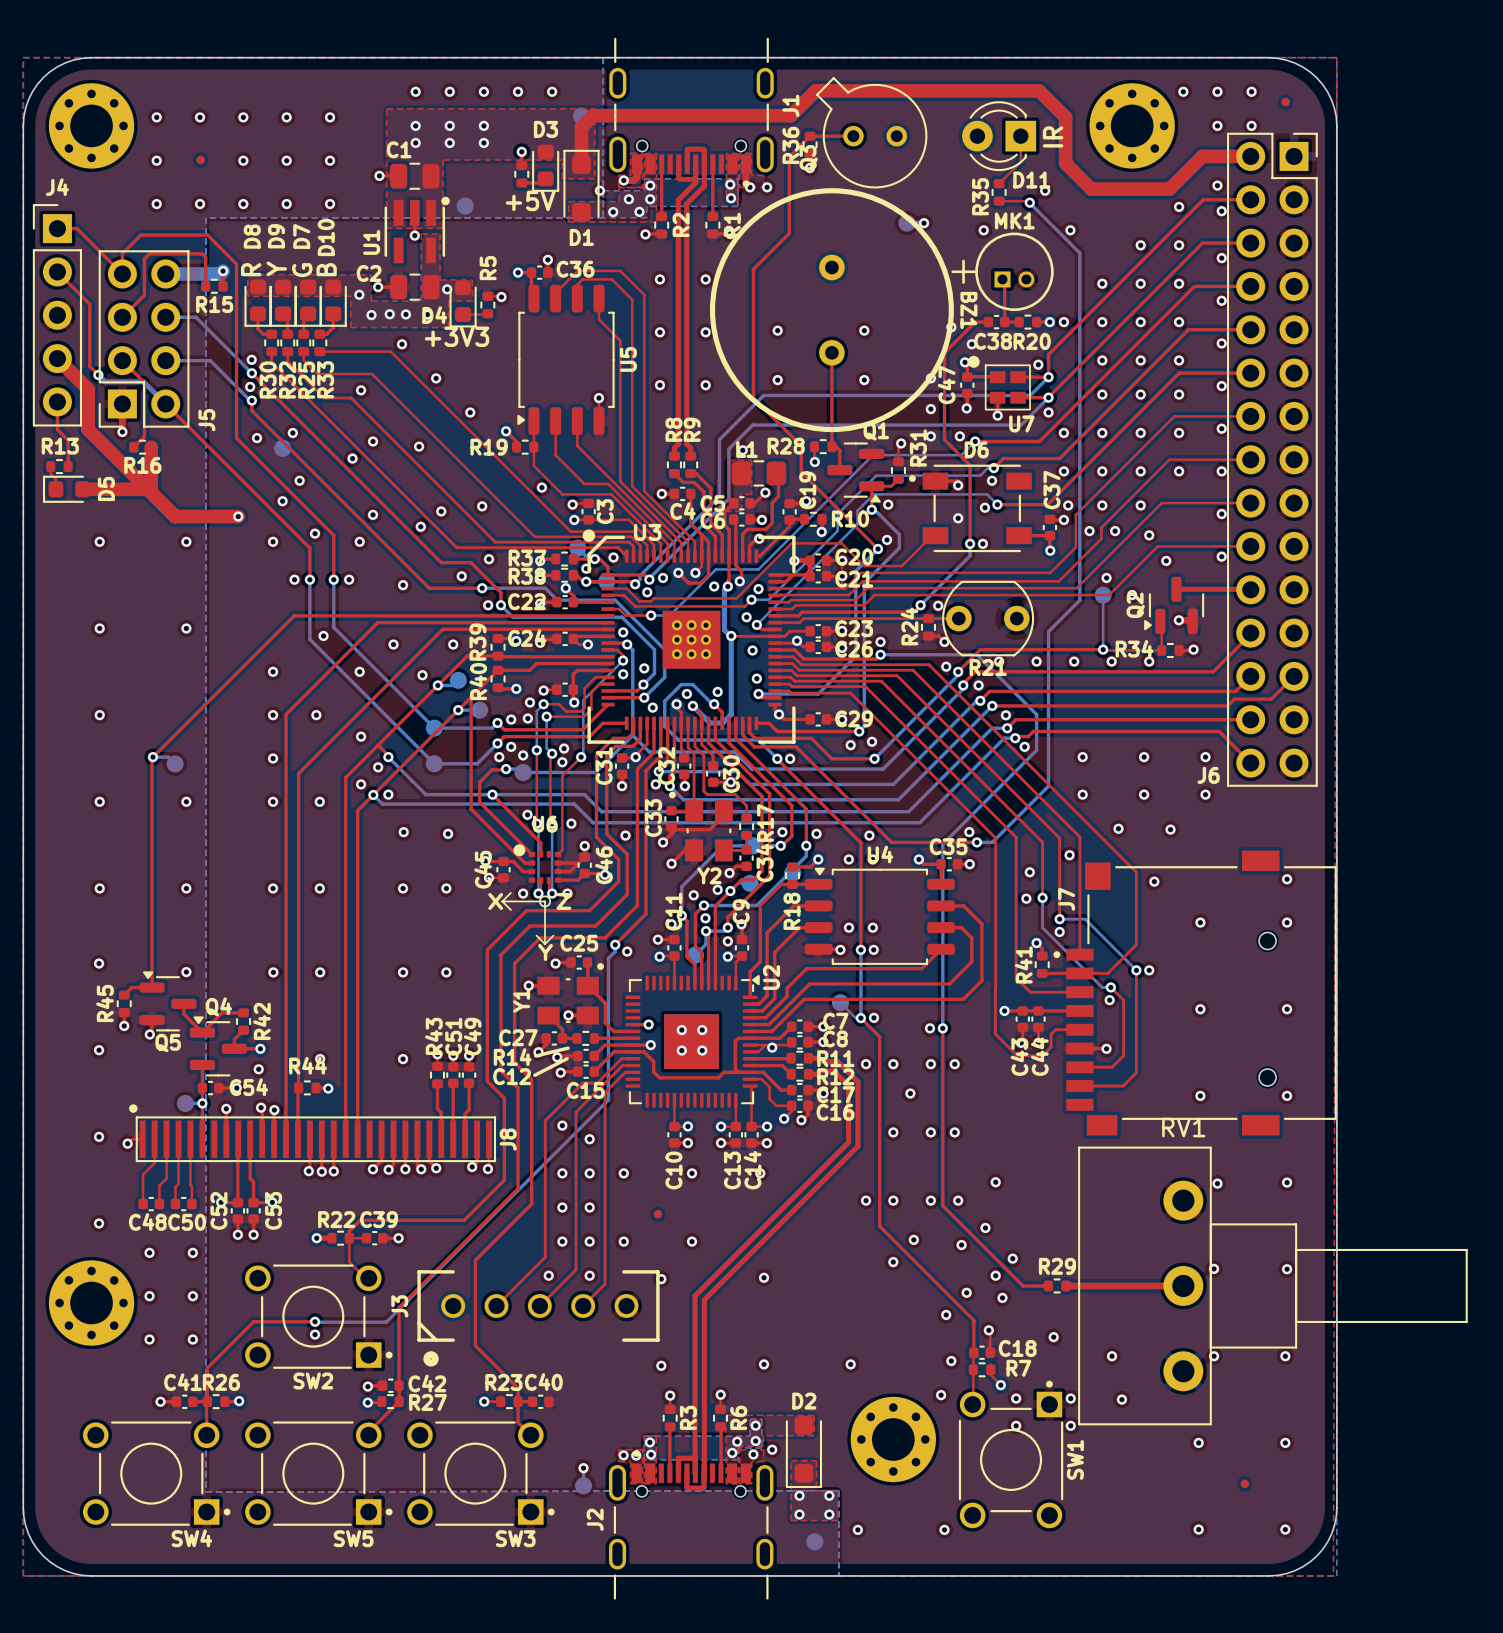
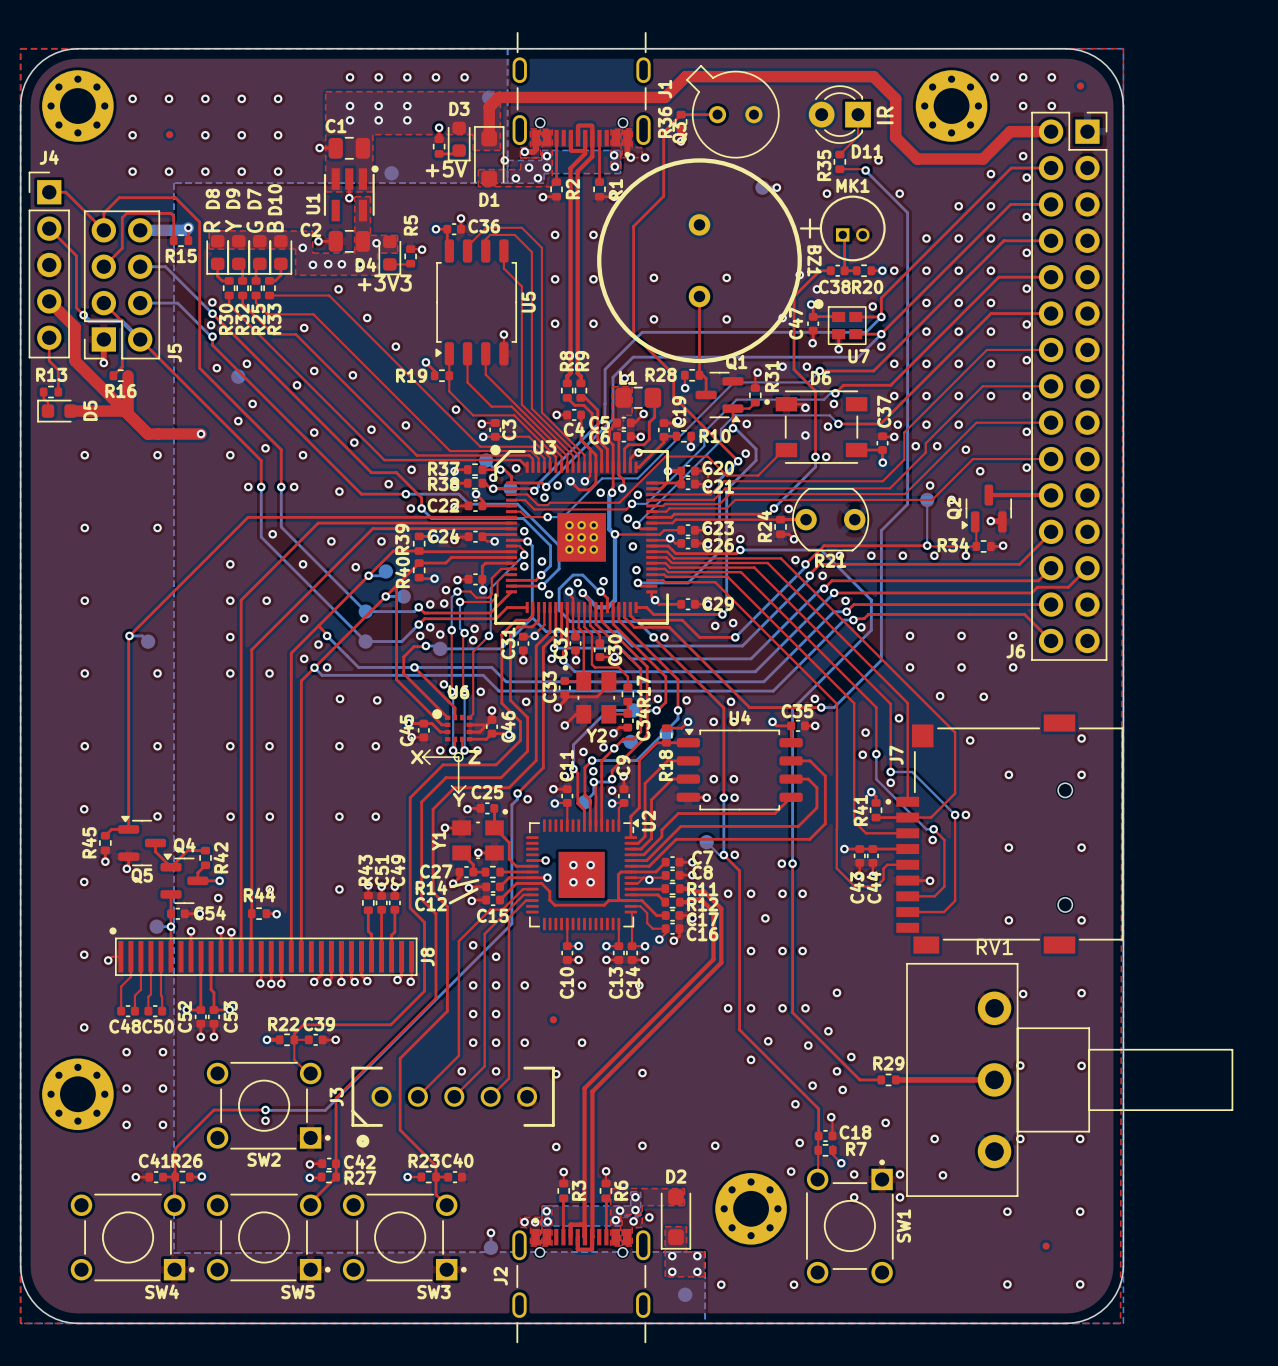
via: (930, 409) -> none

